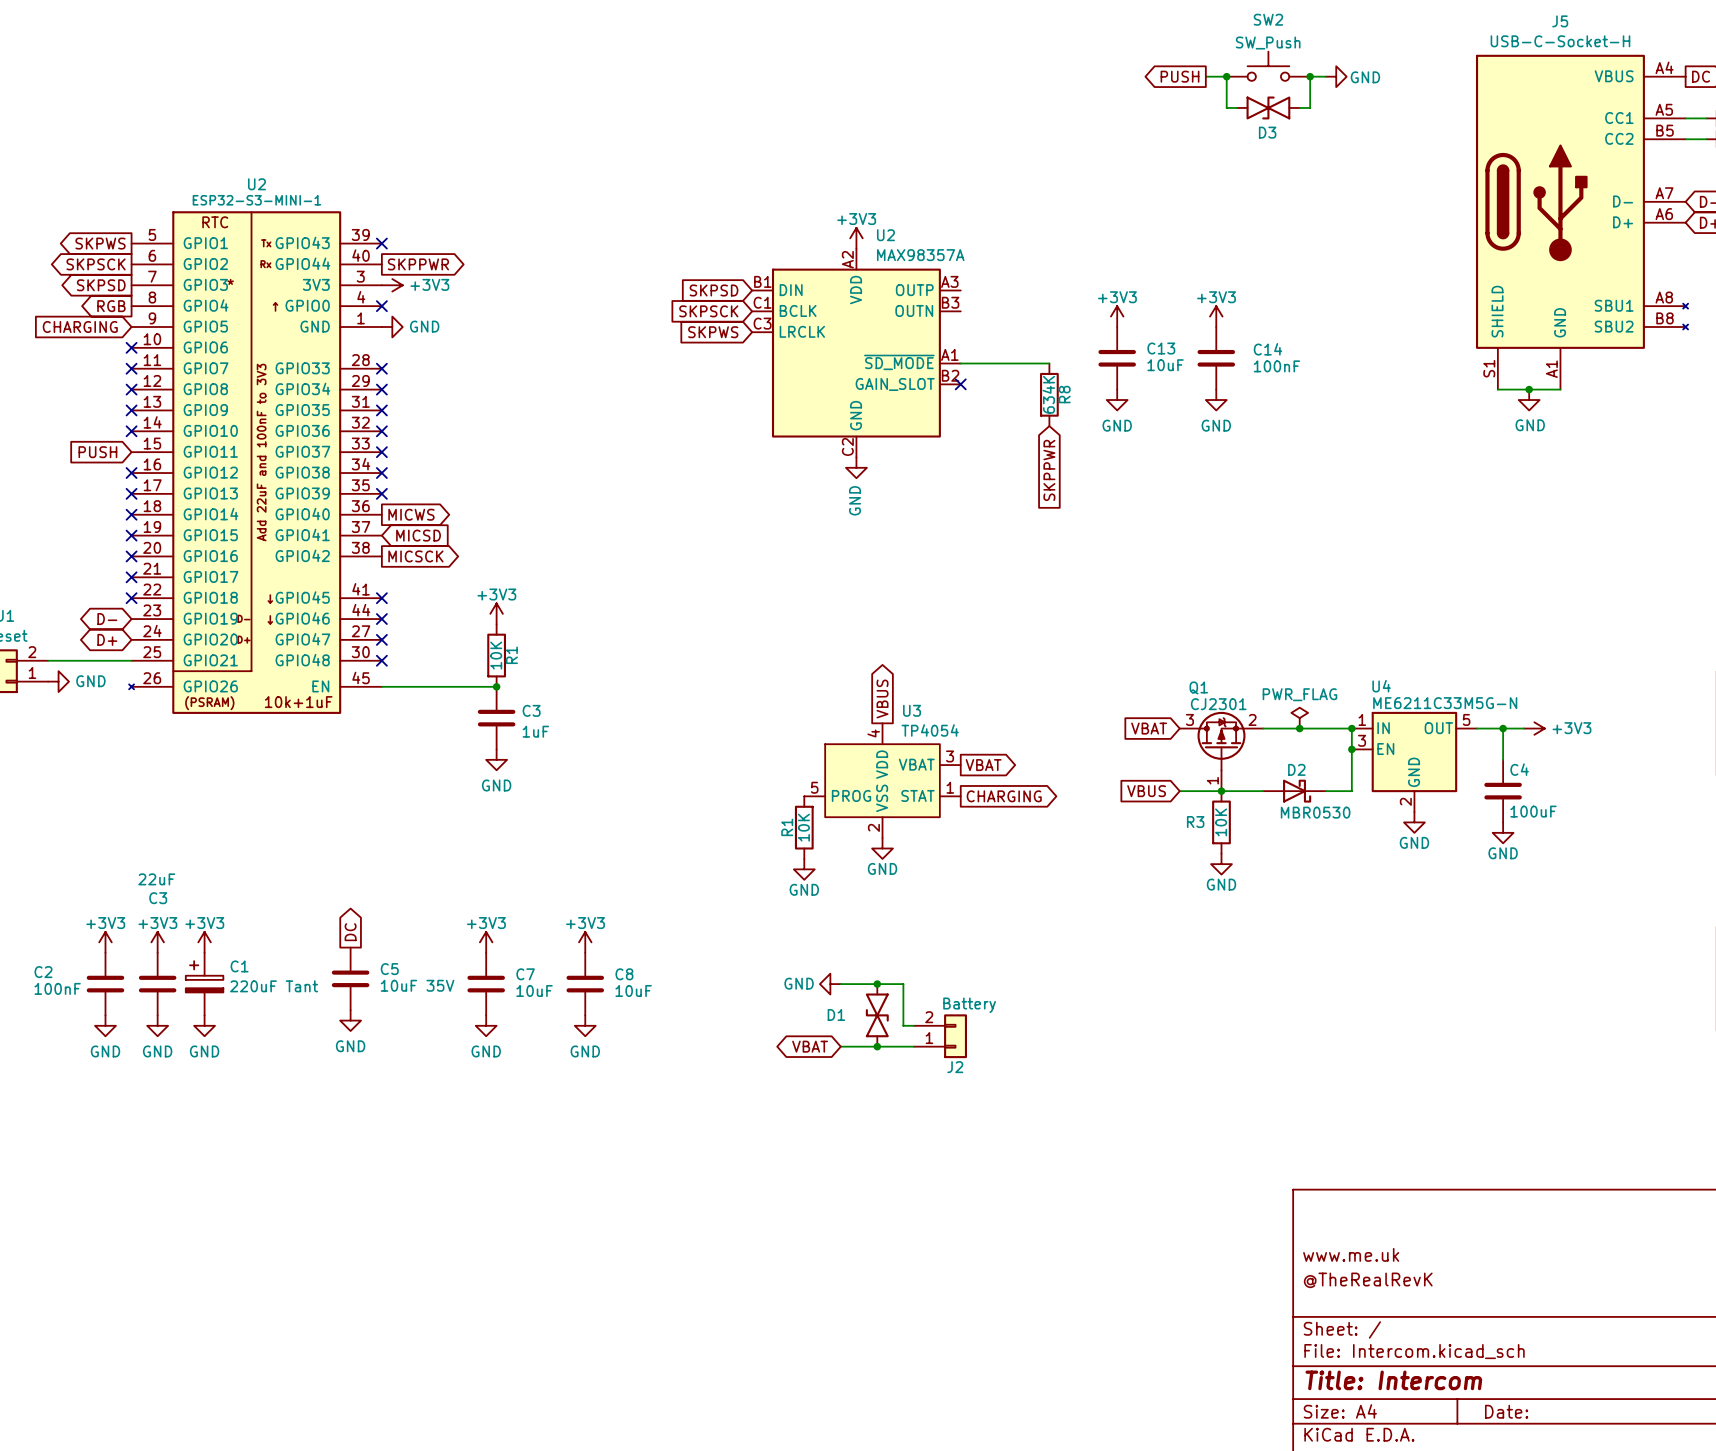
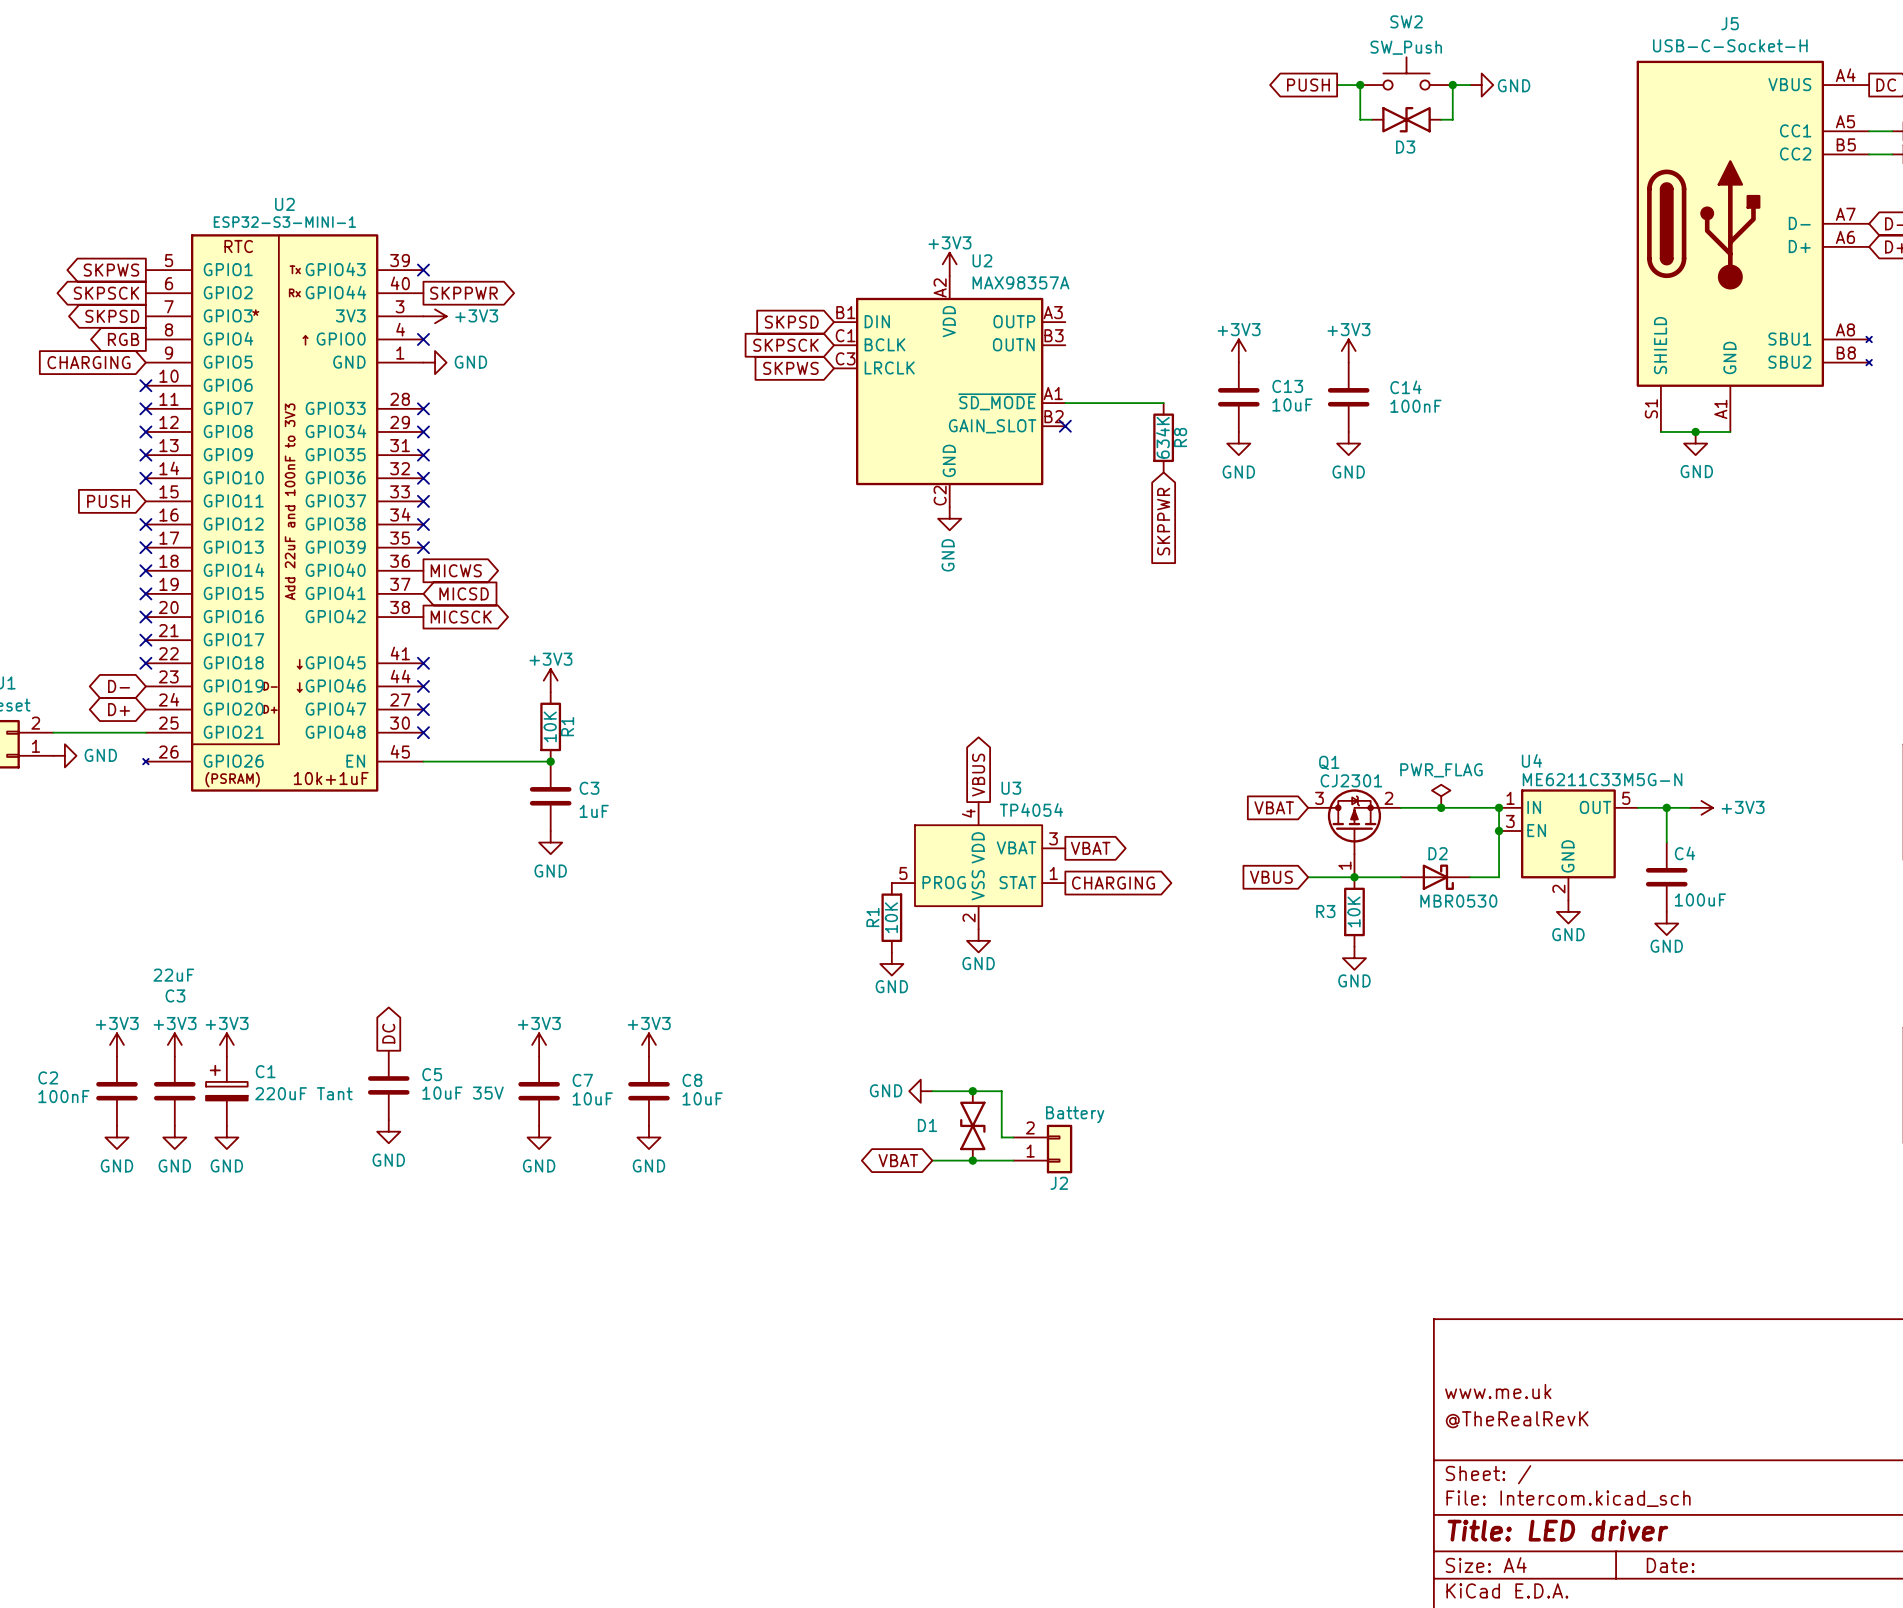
title block: Title: Intercom (1393, 1380) -> Title: LED driver (1557, 1530)

